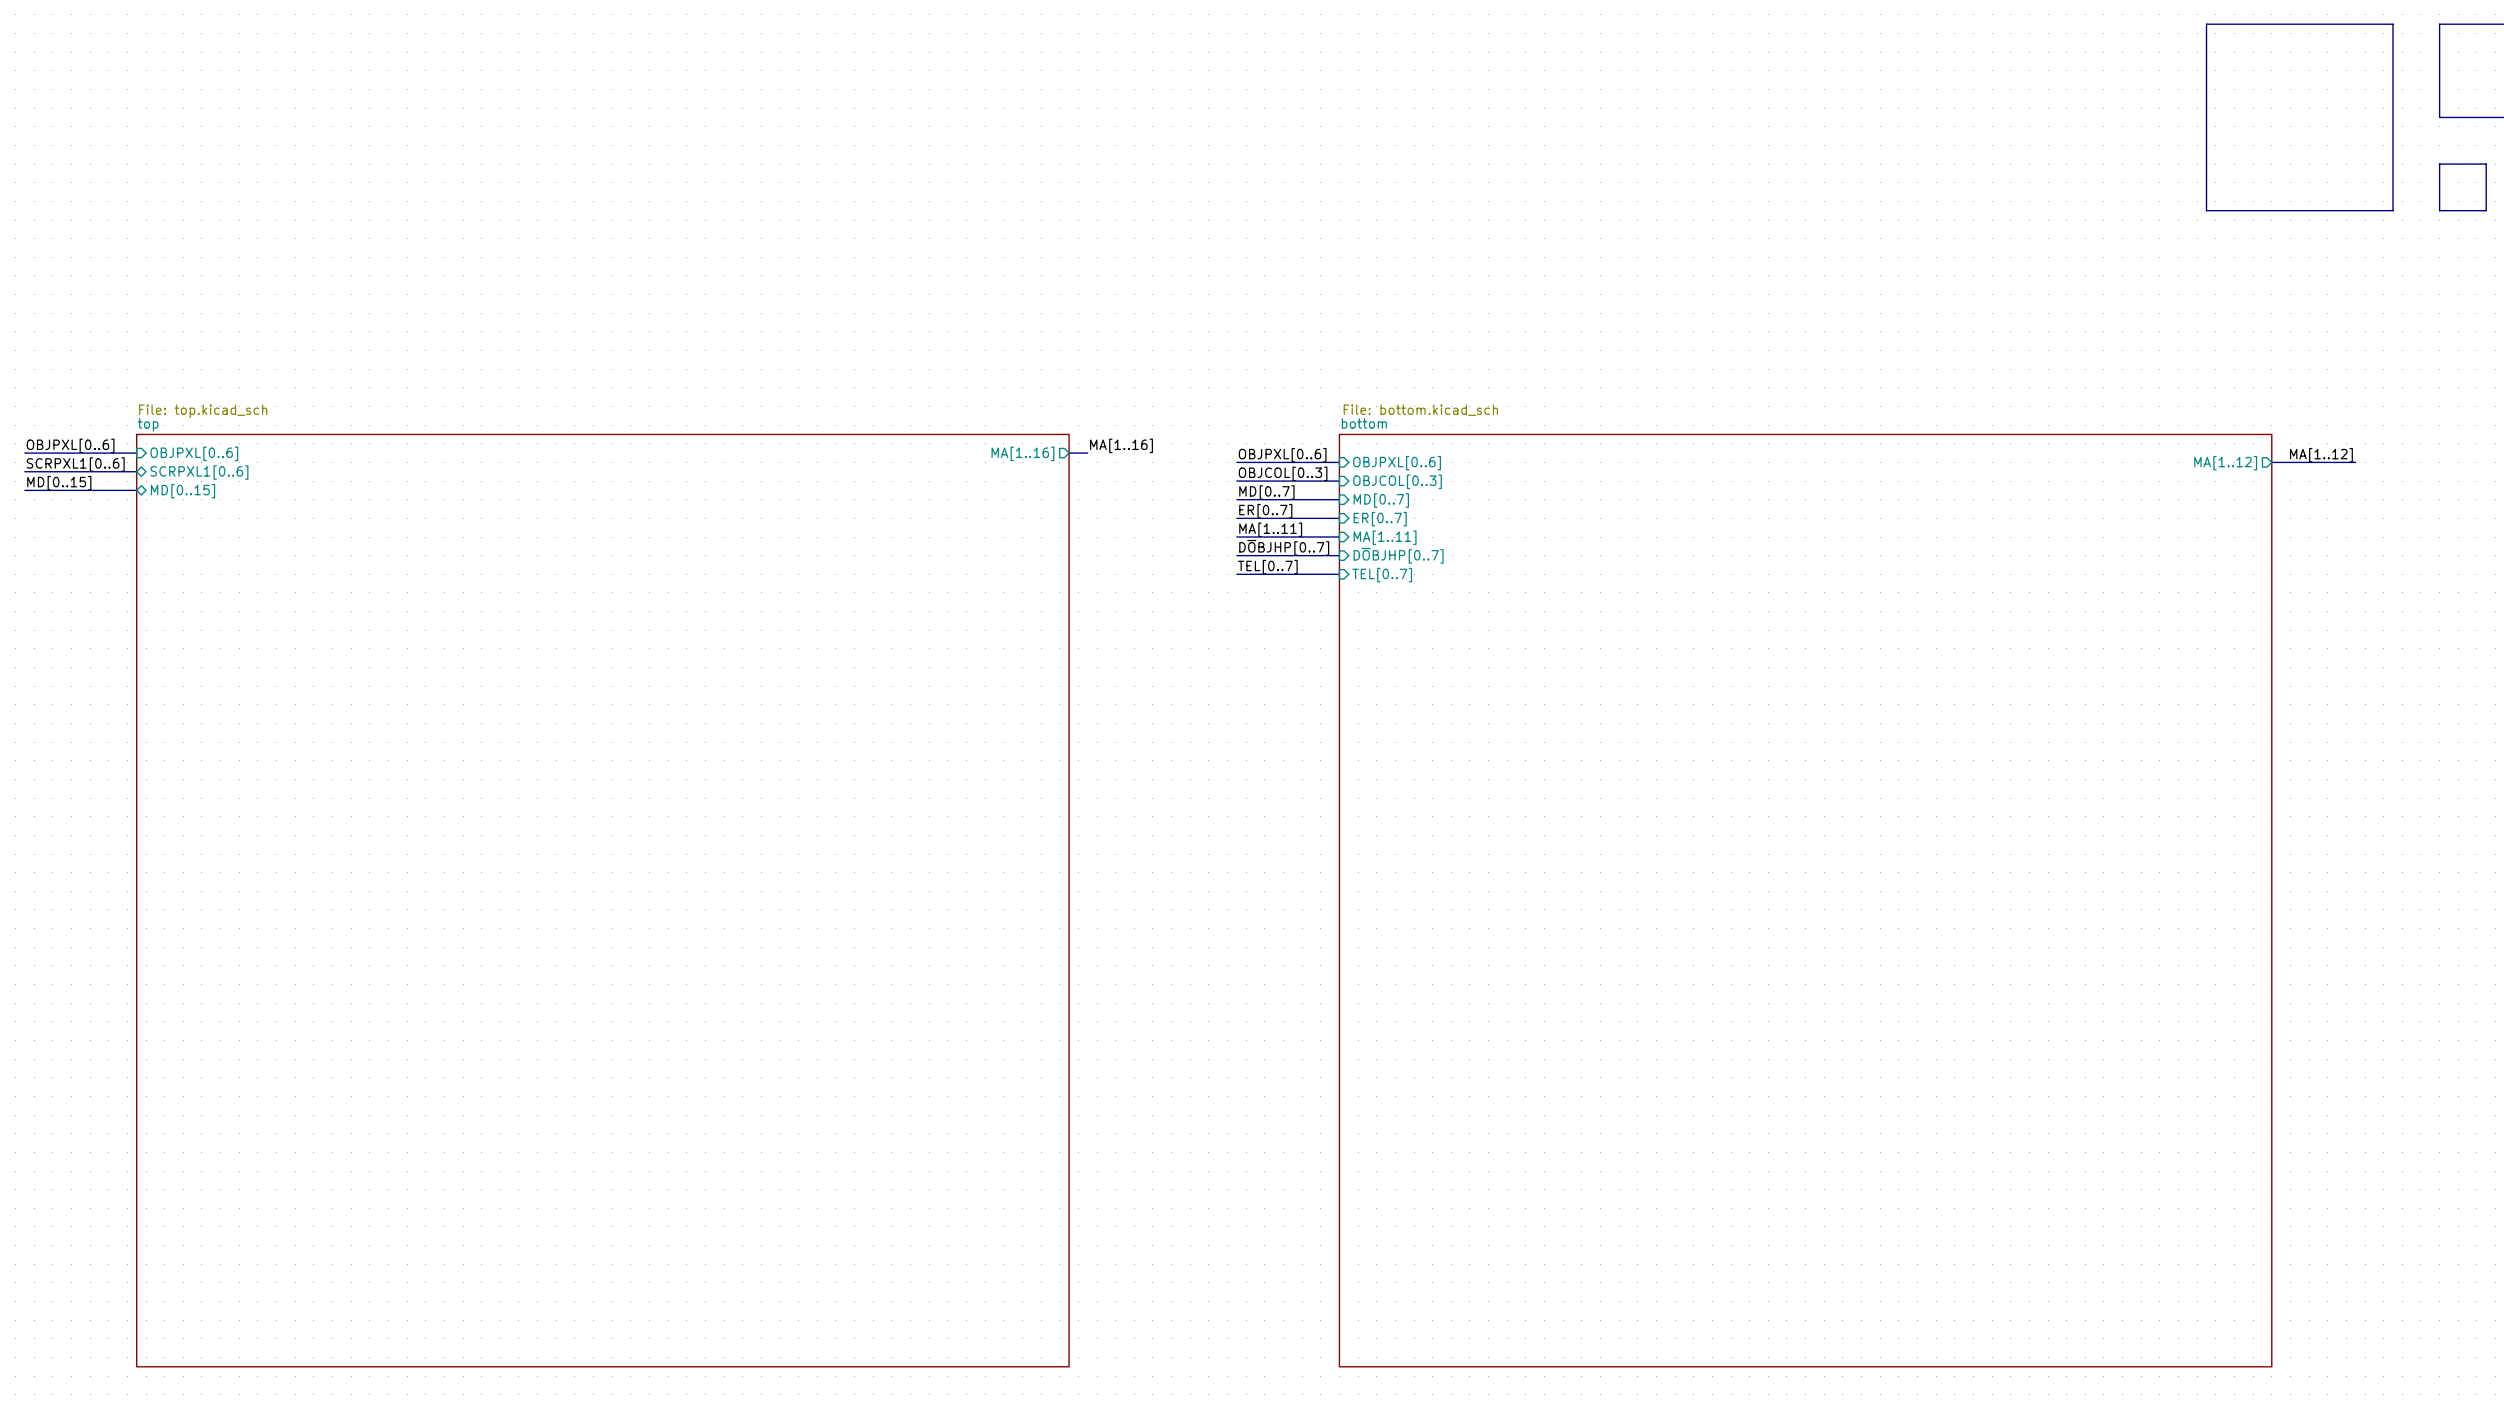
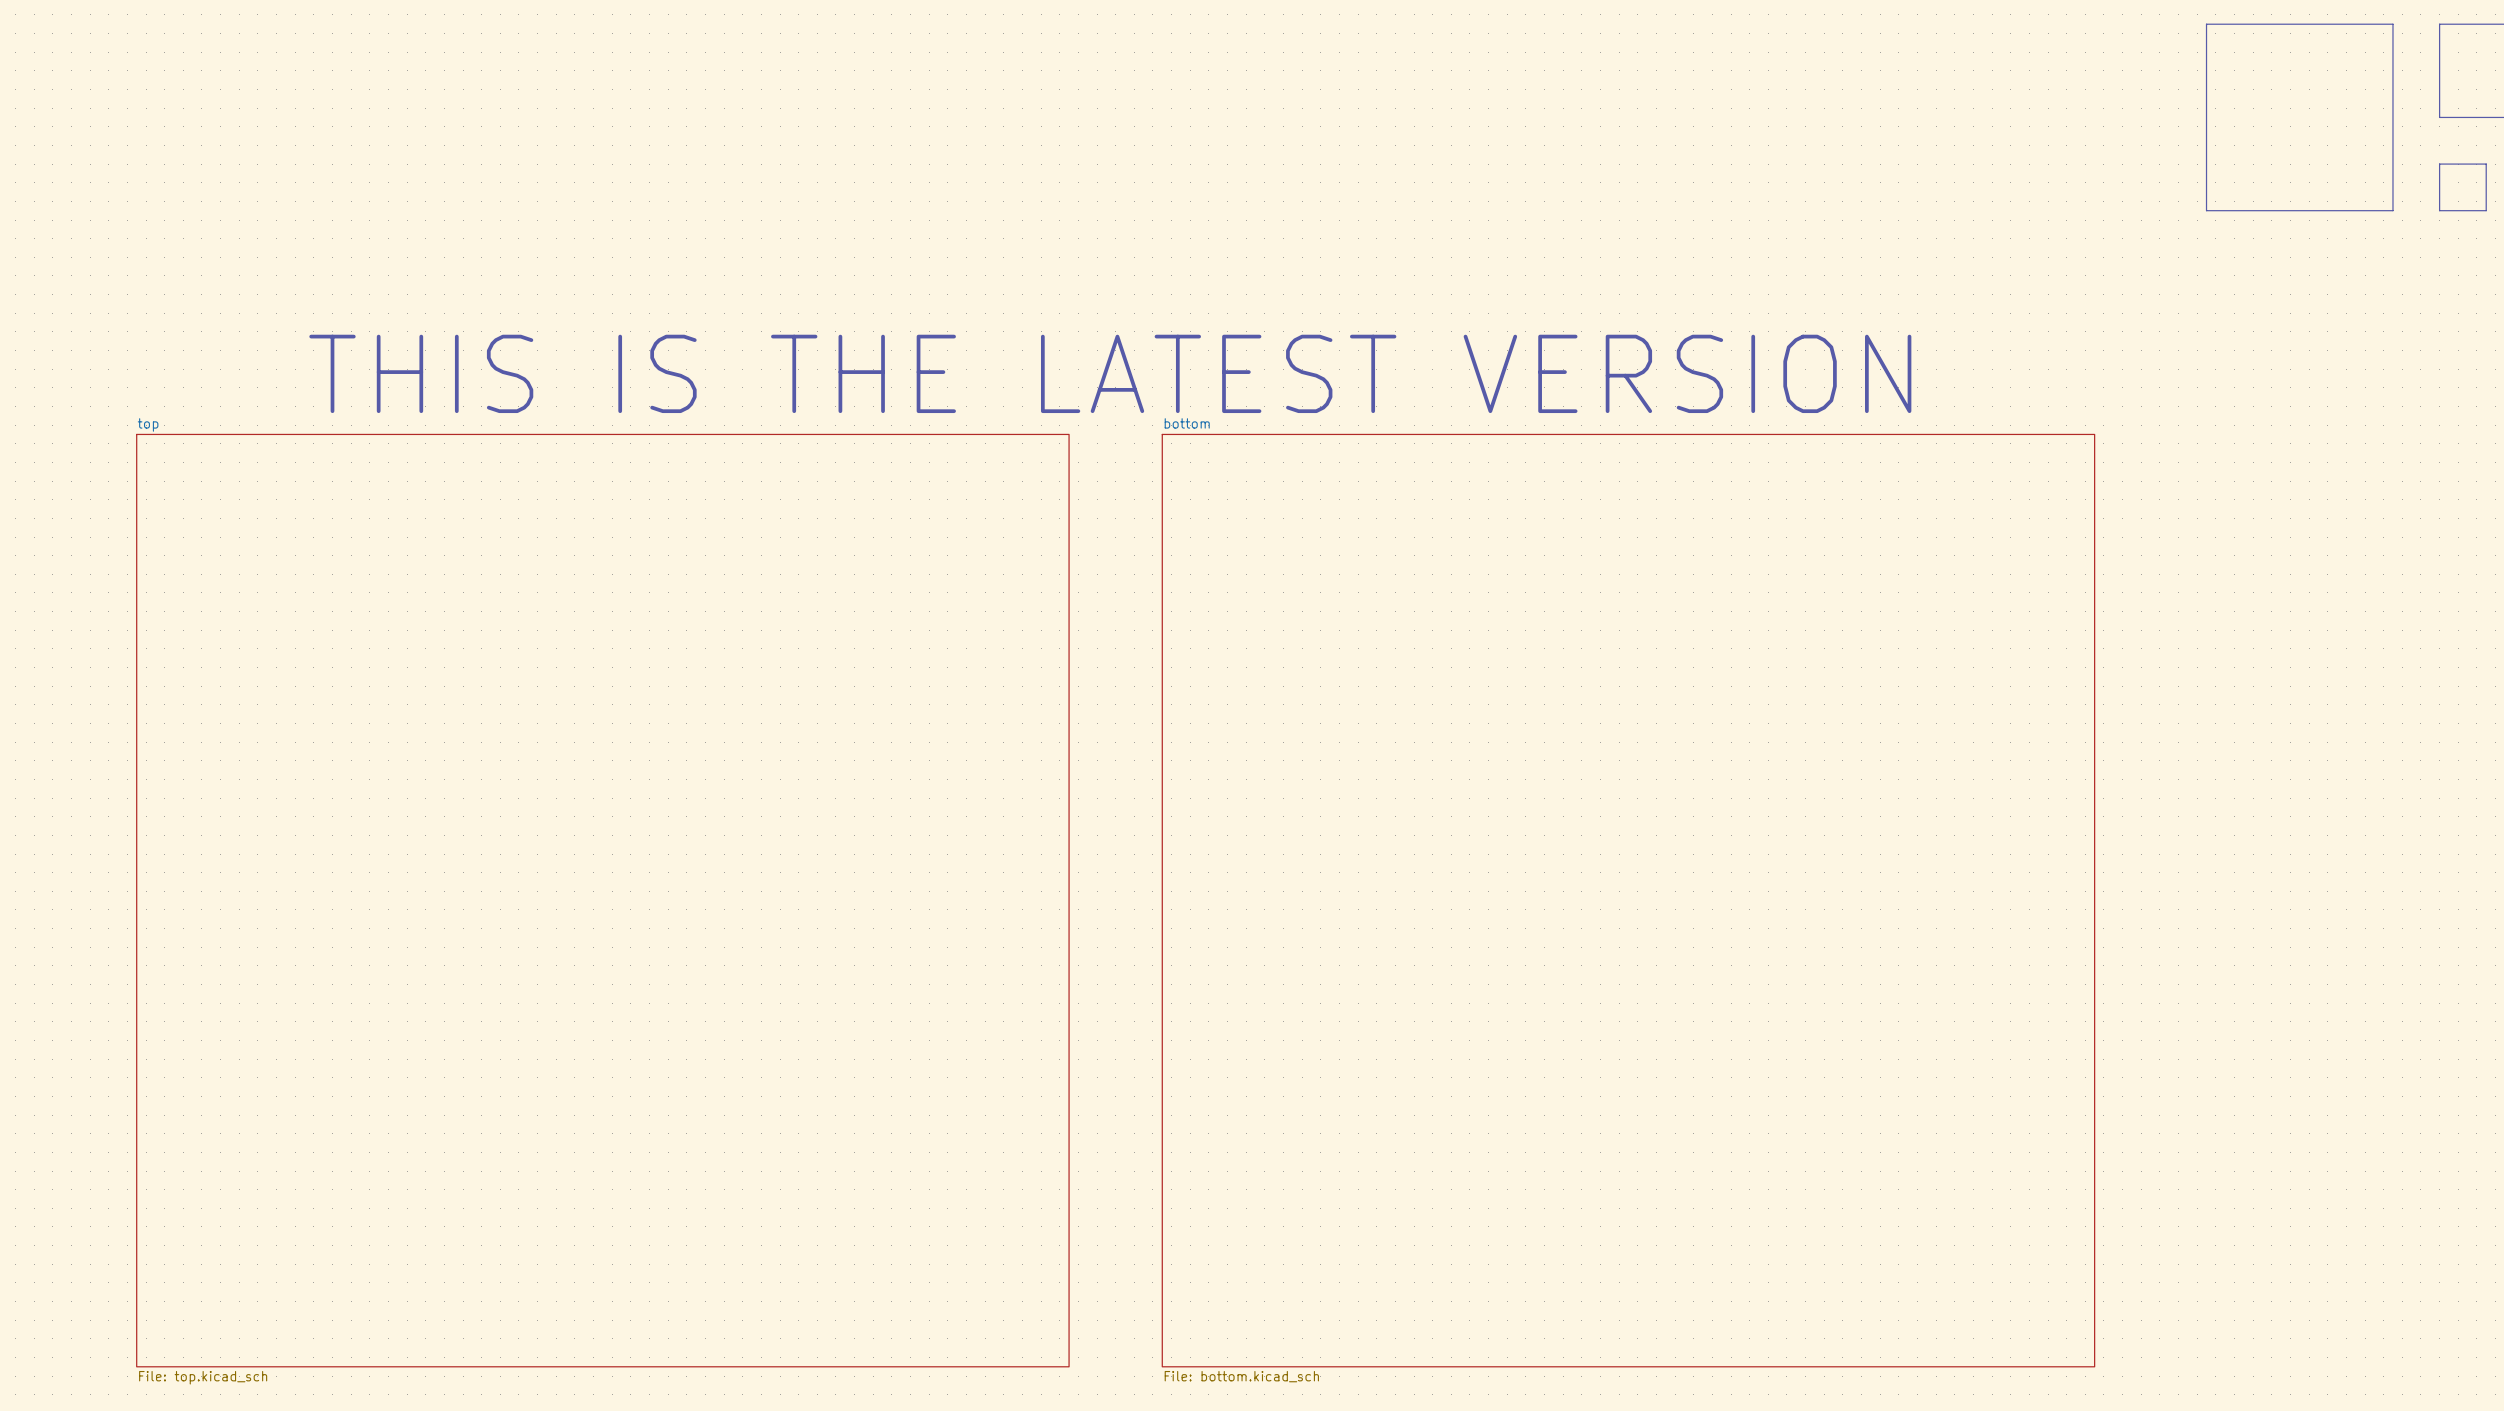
text: none -> THIS IS THE LATEST VERSION (1110, 373)
sheet bottom value position: File: bottom.kicad_sch (1420, 410) -> File: bottom.kicad_sch (1241, 1376)
sheet top value position: File: top.kicad_sch (203, 411) -> File: top.kicad_sch (203, 1377)
label: OBJPXL[0..6] (70, 445) -> none
label: MA[1..16] (1121, 445) -> none
bus: (24, 453) (136, 453) -> none
sheet pin: OBJPXL[0..6] (194, 453) -> none
sheet pin: MA[1..16] (1022, 453) -> none
bus: (1069, 453) (1087, 453) -> none
label: OBJPXL[0..6] (1282, 455) -> none
label: MA[1..12] (2321, 455) -> none
bus: (1236, 462) (1339, 462) -> none
bus: (2271, 462) (2355, 462) -> none
sheet pin: OBJPXL[0..6] (1397, 463) -> none
sheet pin: MA[1..12] (2225, 463) -> none
label: SCRPXL1[0..6] (75, 464) -> none
bus: (24, 471) (136, 471) -> none
sheet pin: SCRPXL1[0..6] (199, 472) -> none
label: OBJCOL[0..3] (1283, 473) -> none
bus: (1236, 481) (1339, 481) -> none
sheet pin: OBJCOL[0..3] (1397, 481) -> none
label: MD[0..15] (59, 483) -> none
bus: (24, 490) (136, 490) -> none
sheet pin: MD[0..15] (183, 491) -> none
label: MD[0..7] (1266, 492) -> none
bus: (1236, 499) (1339, 499) -> none
sheet pin: MD[0..7] (1381, 500) -> none
label: ER[0..7] (1265, 511) -> none
bus: (1236, 518) (1339, 518) -> none
sheet pin: ER[0..7] (1380, 519) -> none
label: MA[1..11] (1270, 529) -> none
bus: (1236, 537) (1339, 537) -> none
sheet pin: MA[1..11] (1385, 537) -> none
label: D~{O}BJHP[0..7] (1284, 547) -> none
bus: (1236, 555) (1339, 555) -> none
sheet pin: D~{O}BJHP[0..7] (1398, 555) -> none
label: TEL[0..7] (1267, 567) -> none
bus: (1236, 574) (1339, 574) -> none
sheet pin: TEL[0..7] (1382, 575) -> none
sheet bottom position: (1805, 900) -> (1628, 900)

